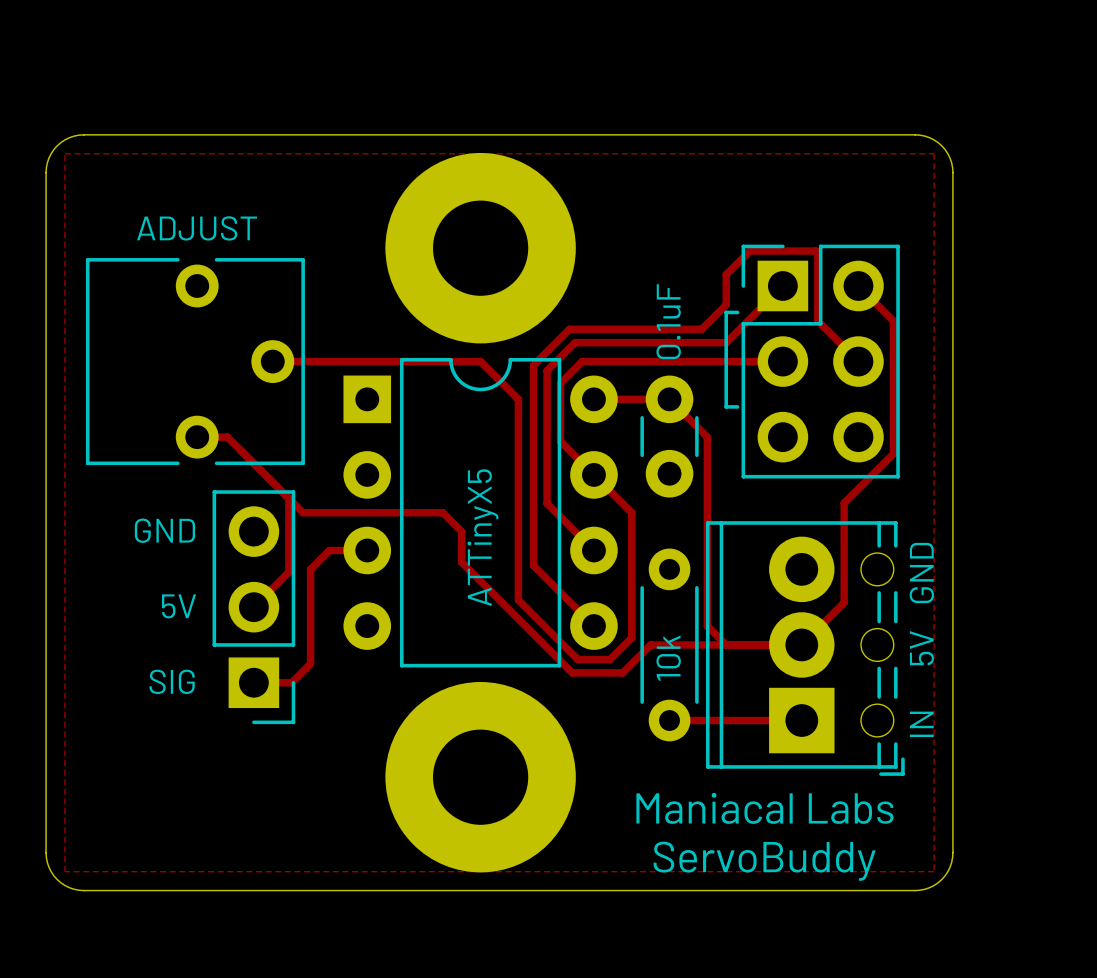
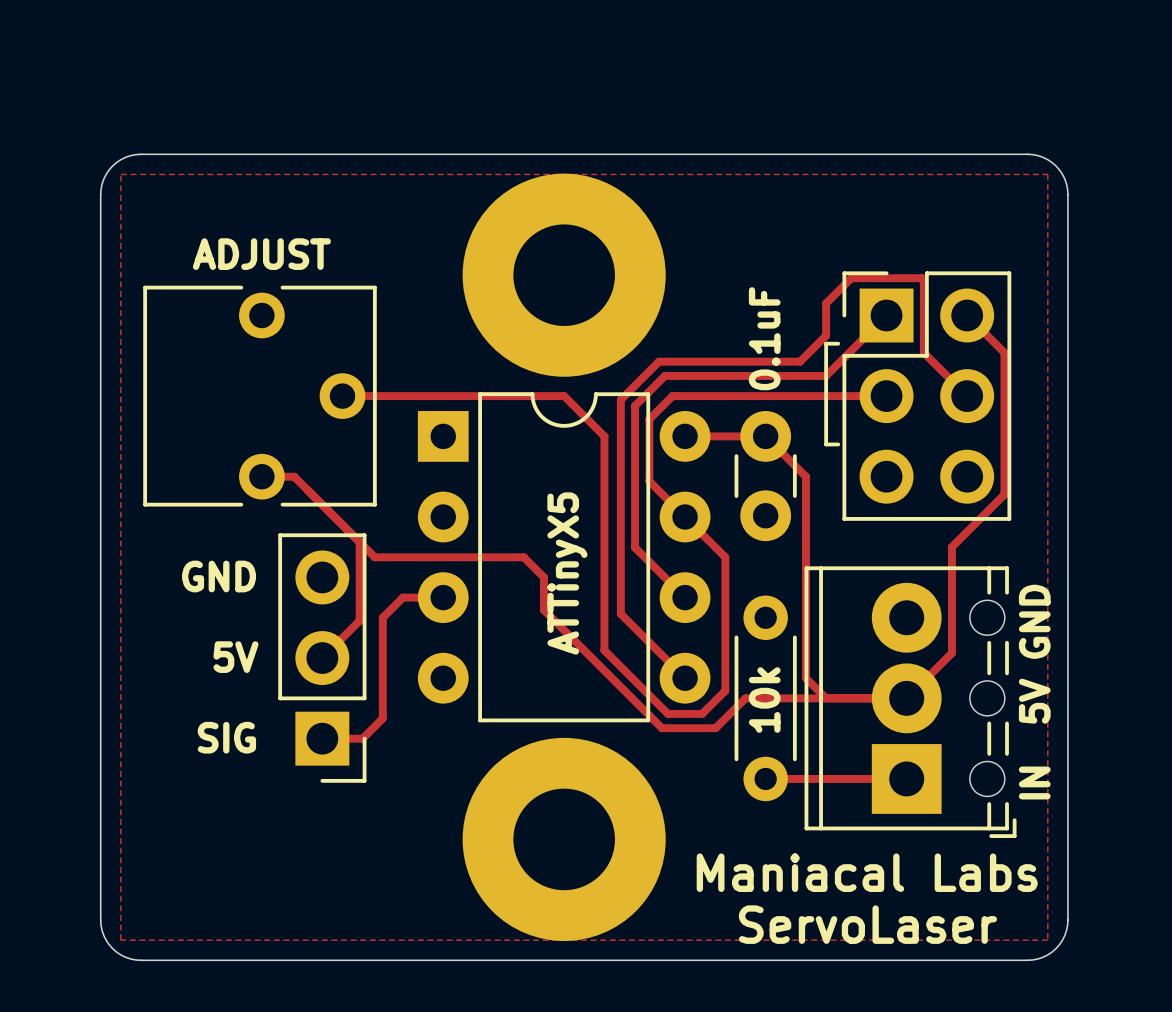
text: ServoBuddy (764, 861) -> ServoLaser (867, 924)

